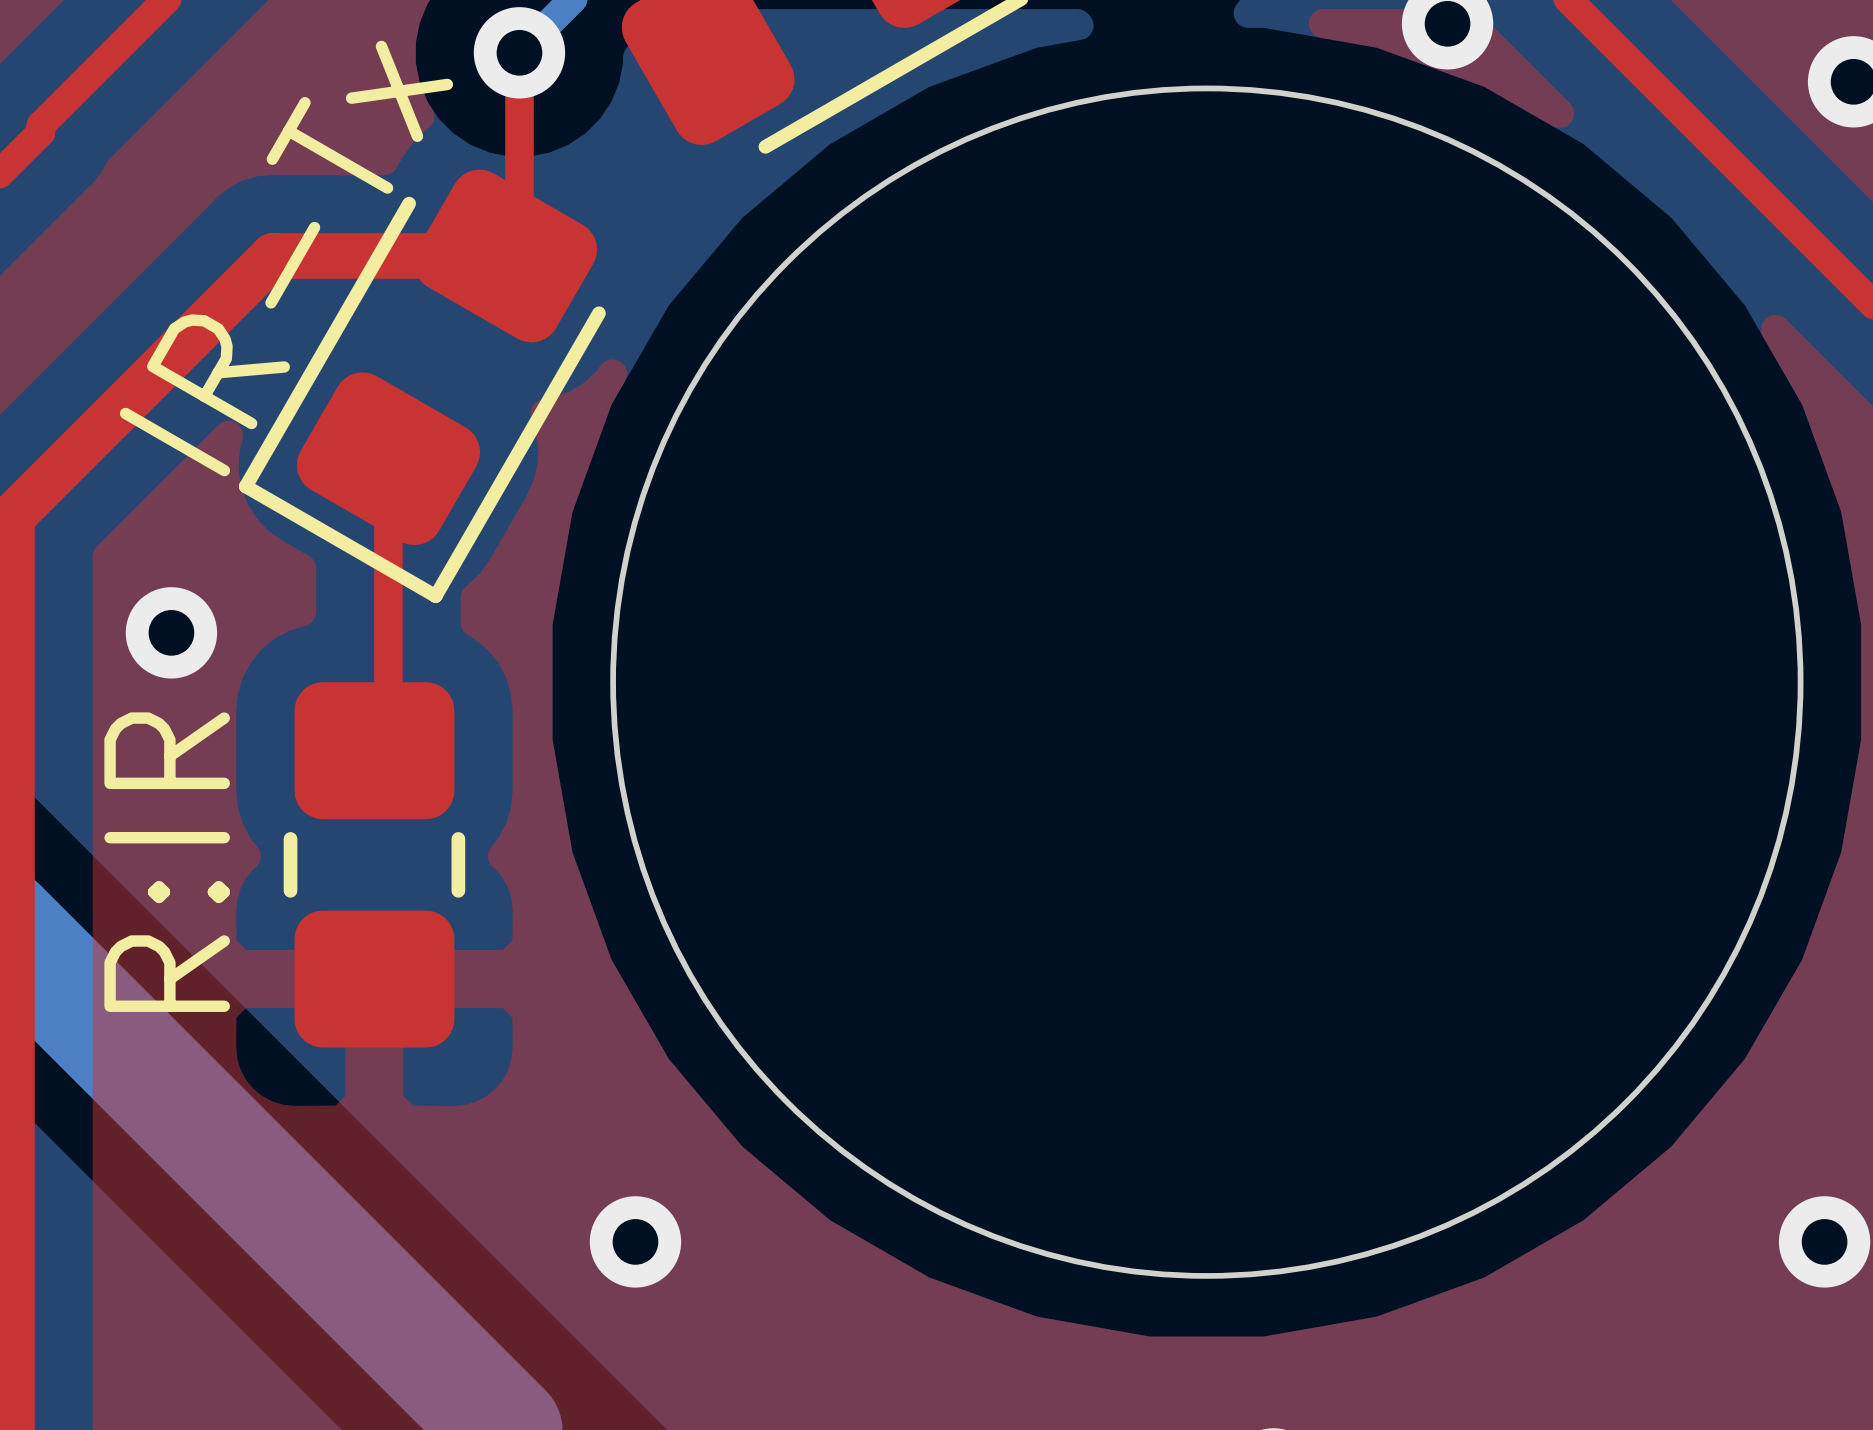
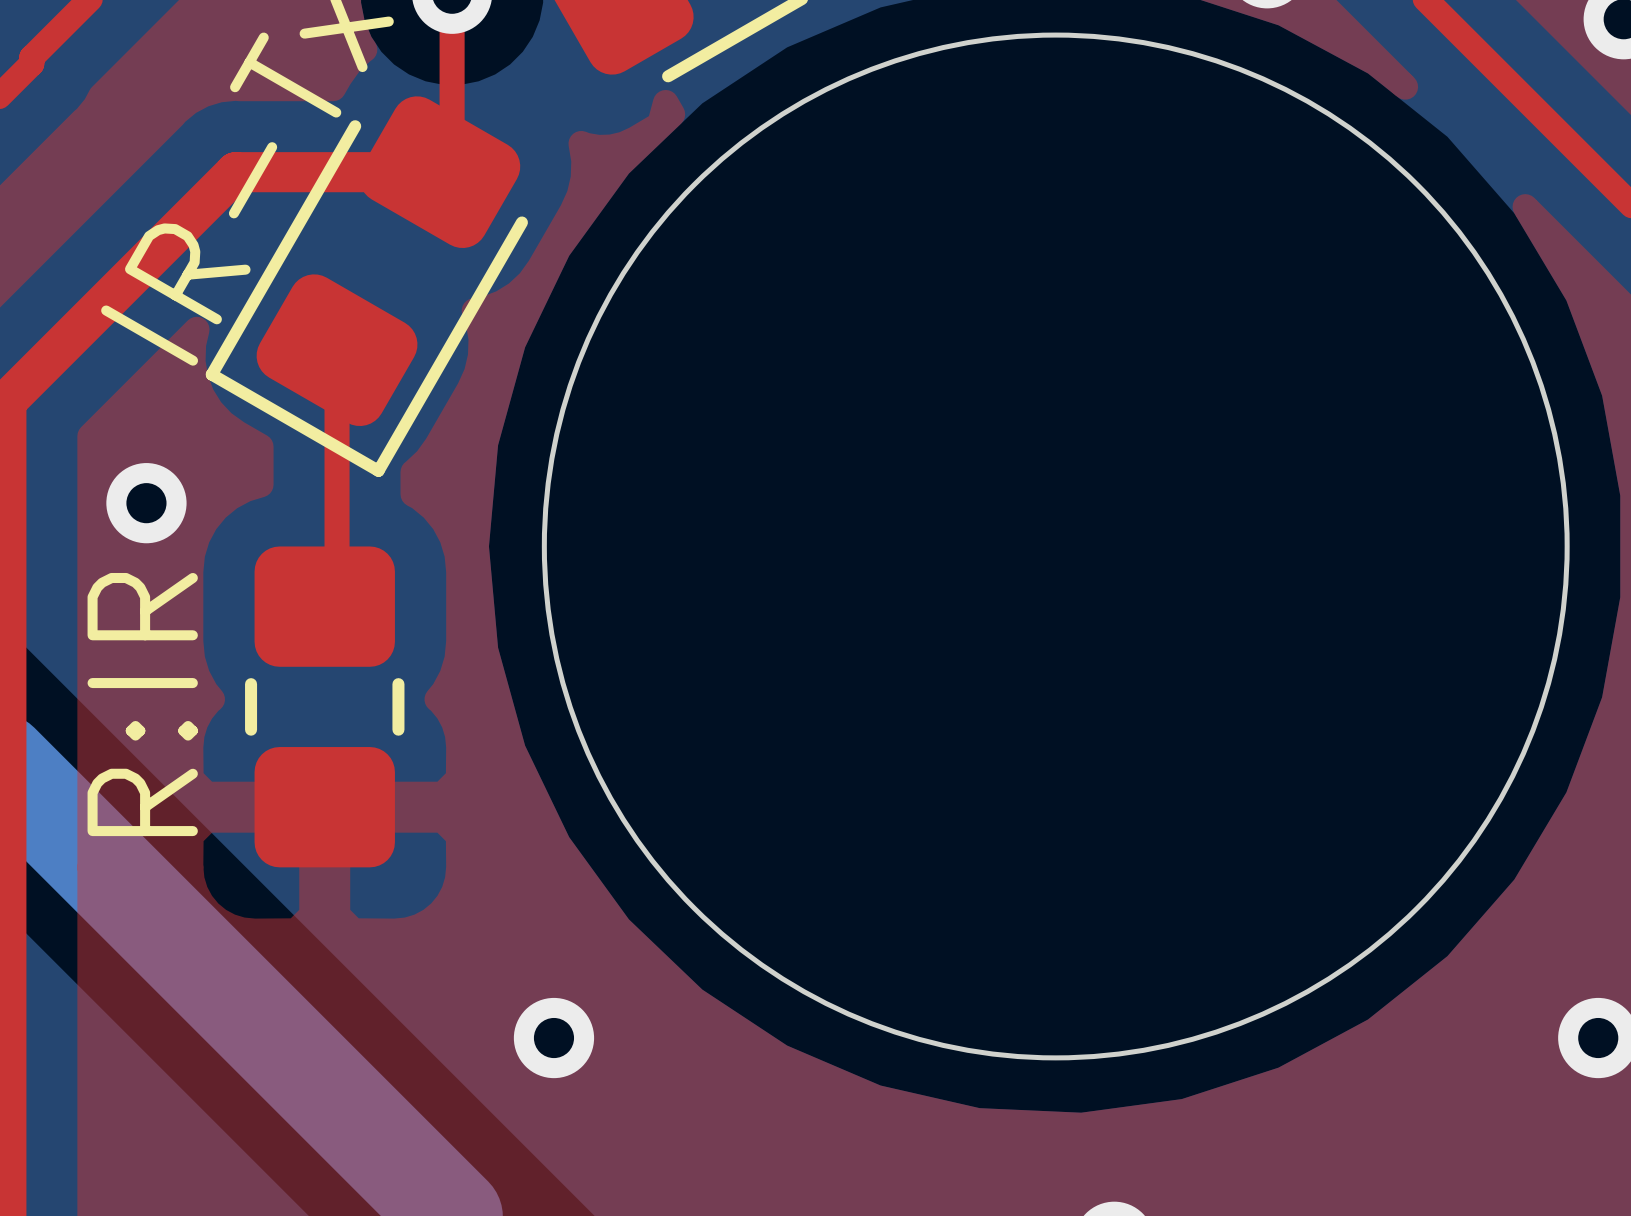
round board edge size: [610, 85, 1804, 1279] -> [541, 32, 1570, 1061]

